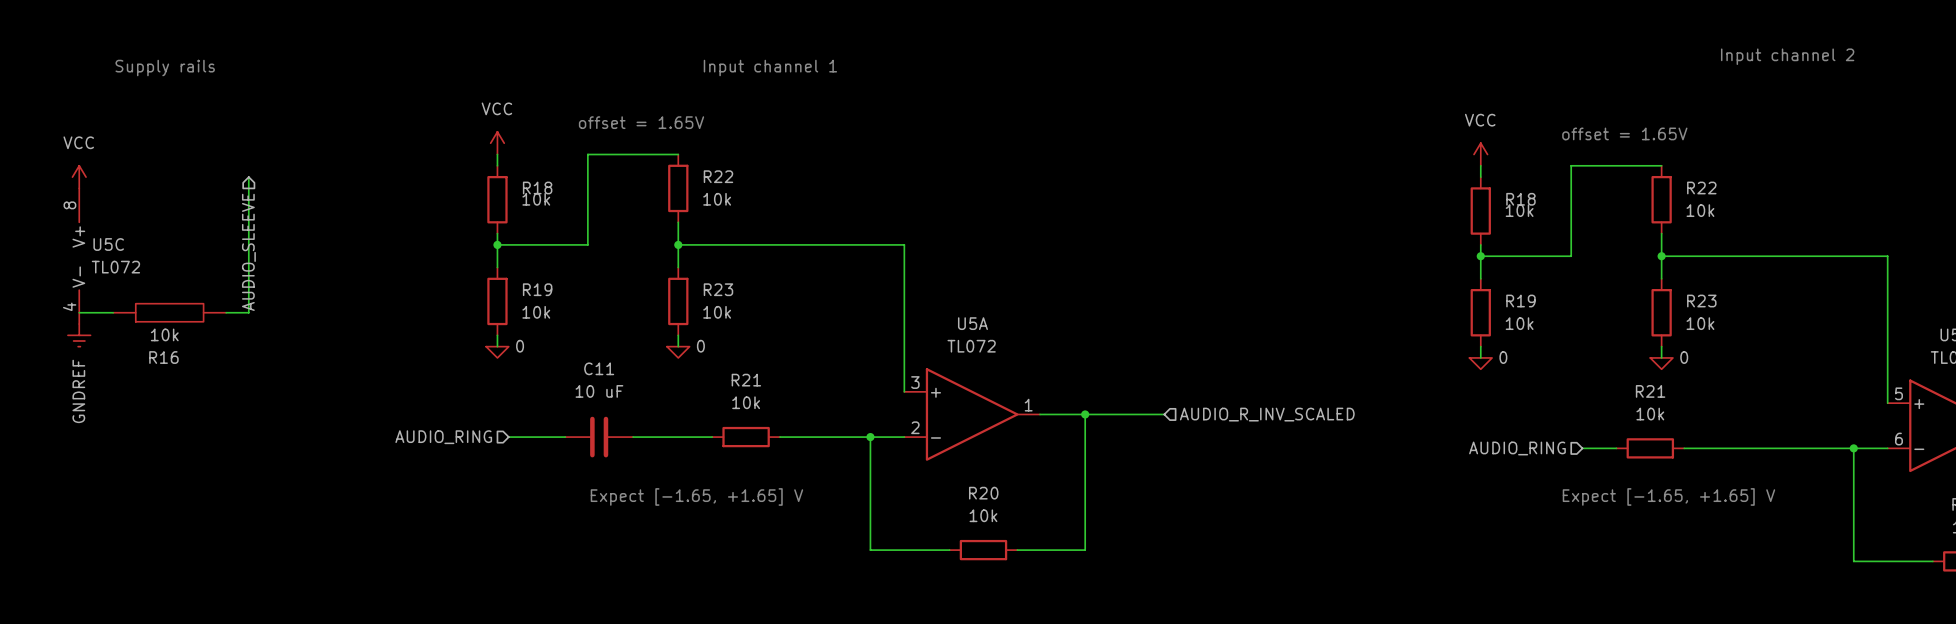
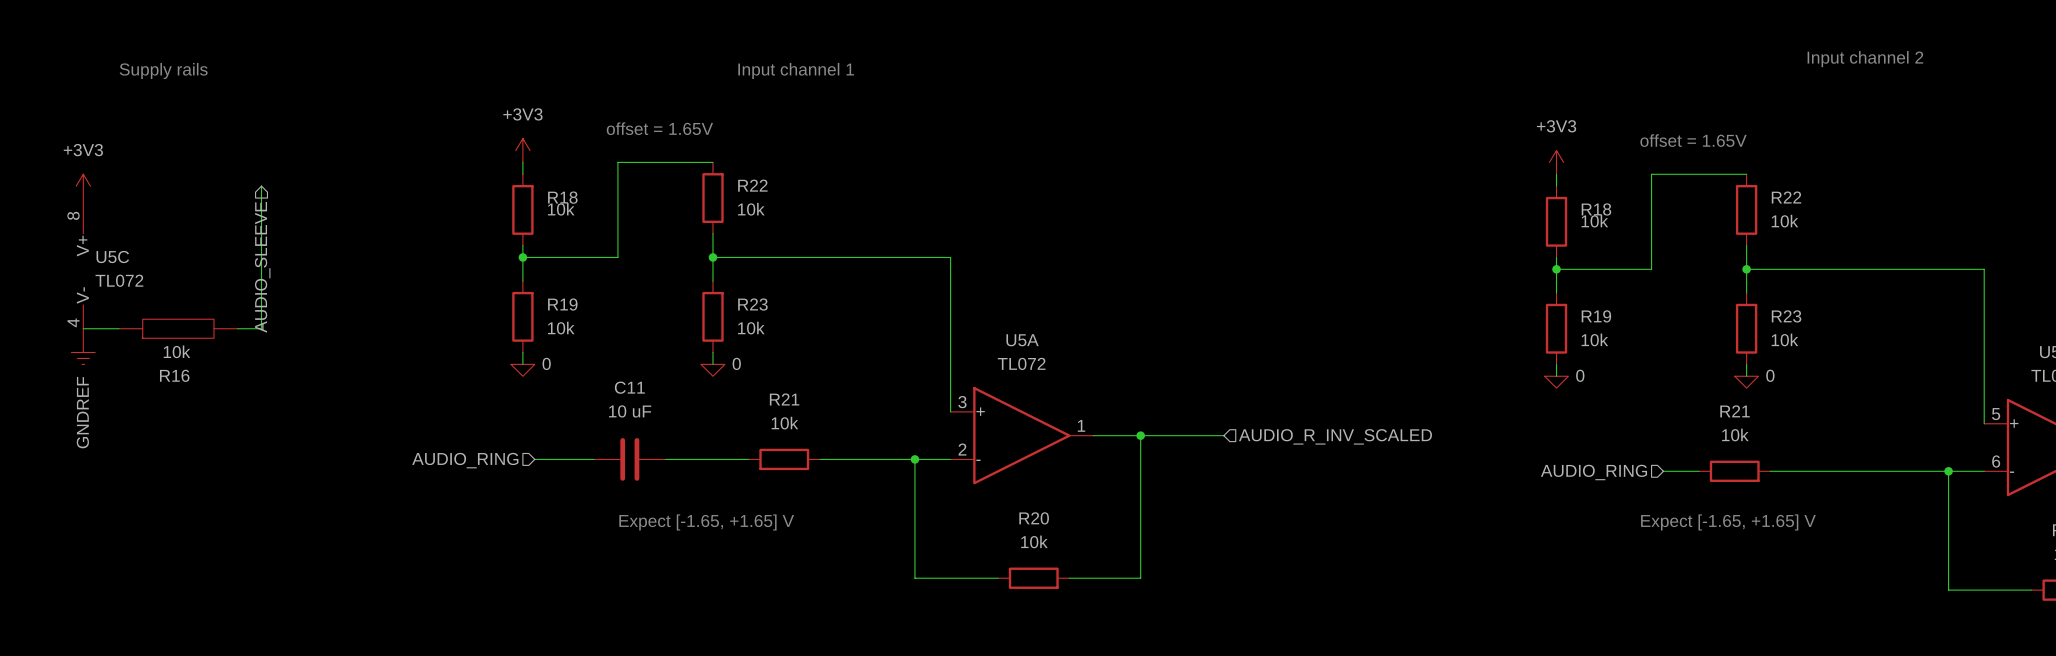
power symbol: VCC (497, 143) -> +3V3 (522, 150)
power symbol: VCC (1480, 154) -> +3V3 (1556, 162)
power symbol: VCC (79, 177) -> +3V3 (83, 186)

